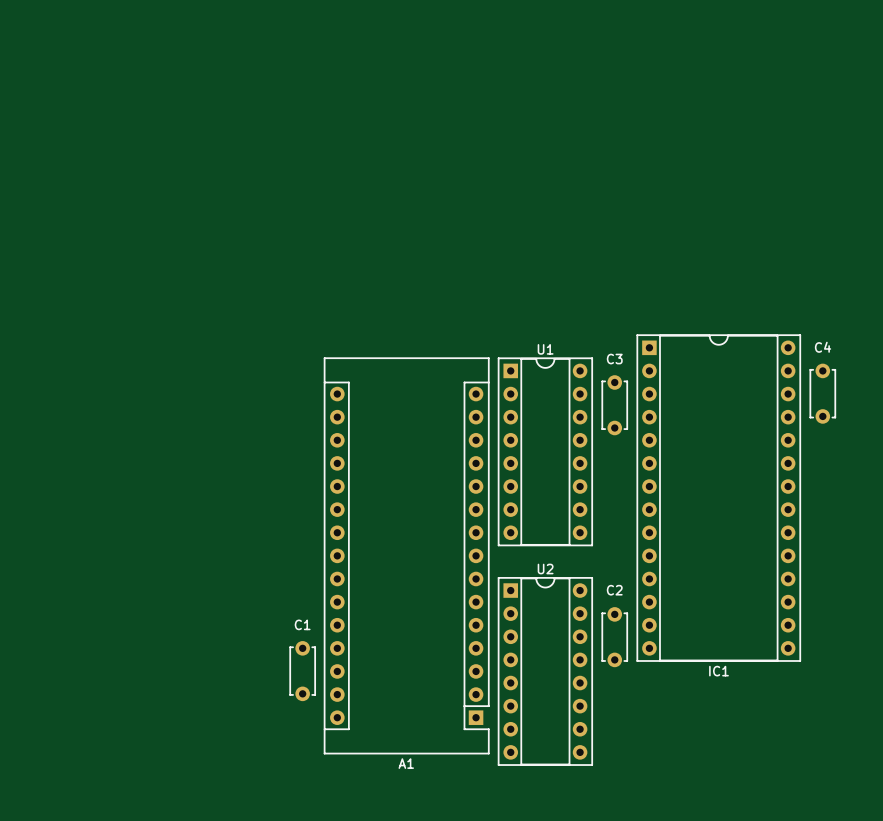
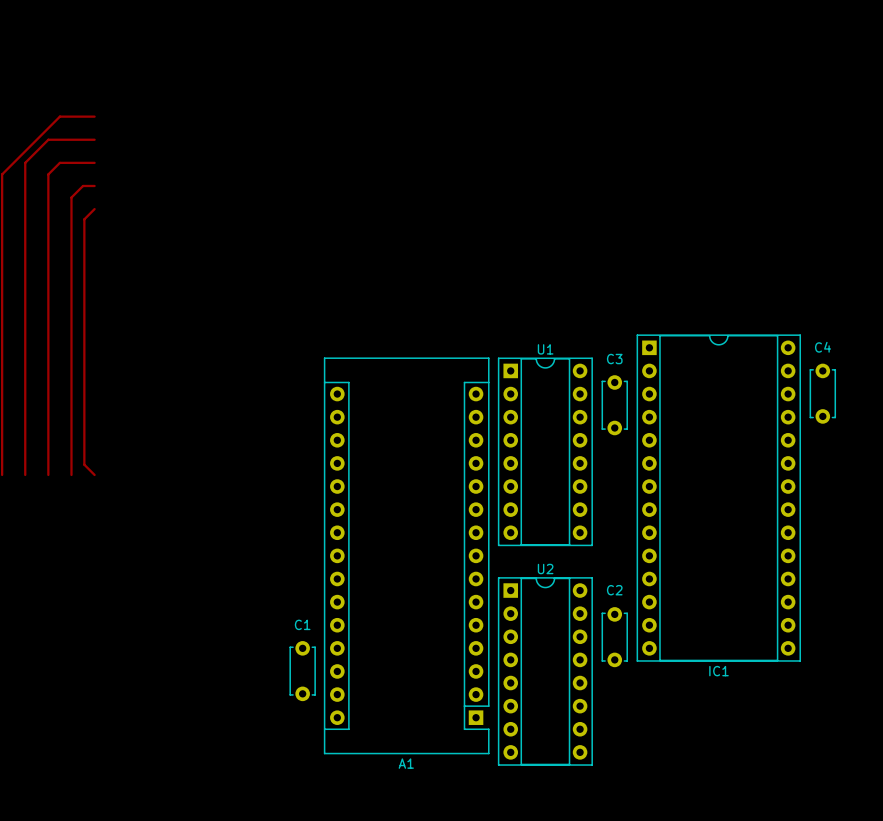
track: none -> (94, 116) (59, 116) (2, 174) (2, 474)
track: none -> (94, 139) (48, 139) (25, 162) (25, 474)
track: none -> (94, 162) (59, 162) (48, 174) (48, 474)
track: none -> (94, 185) (83, 185) (71, 197) (71, 474)
track: none -> (94, 209) (84, 219) (84, 464) (94, 474)

